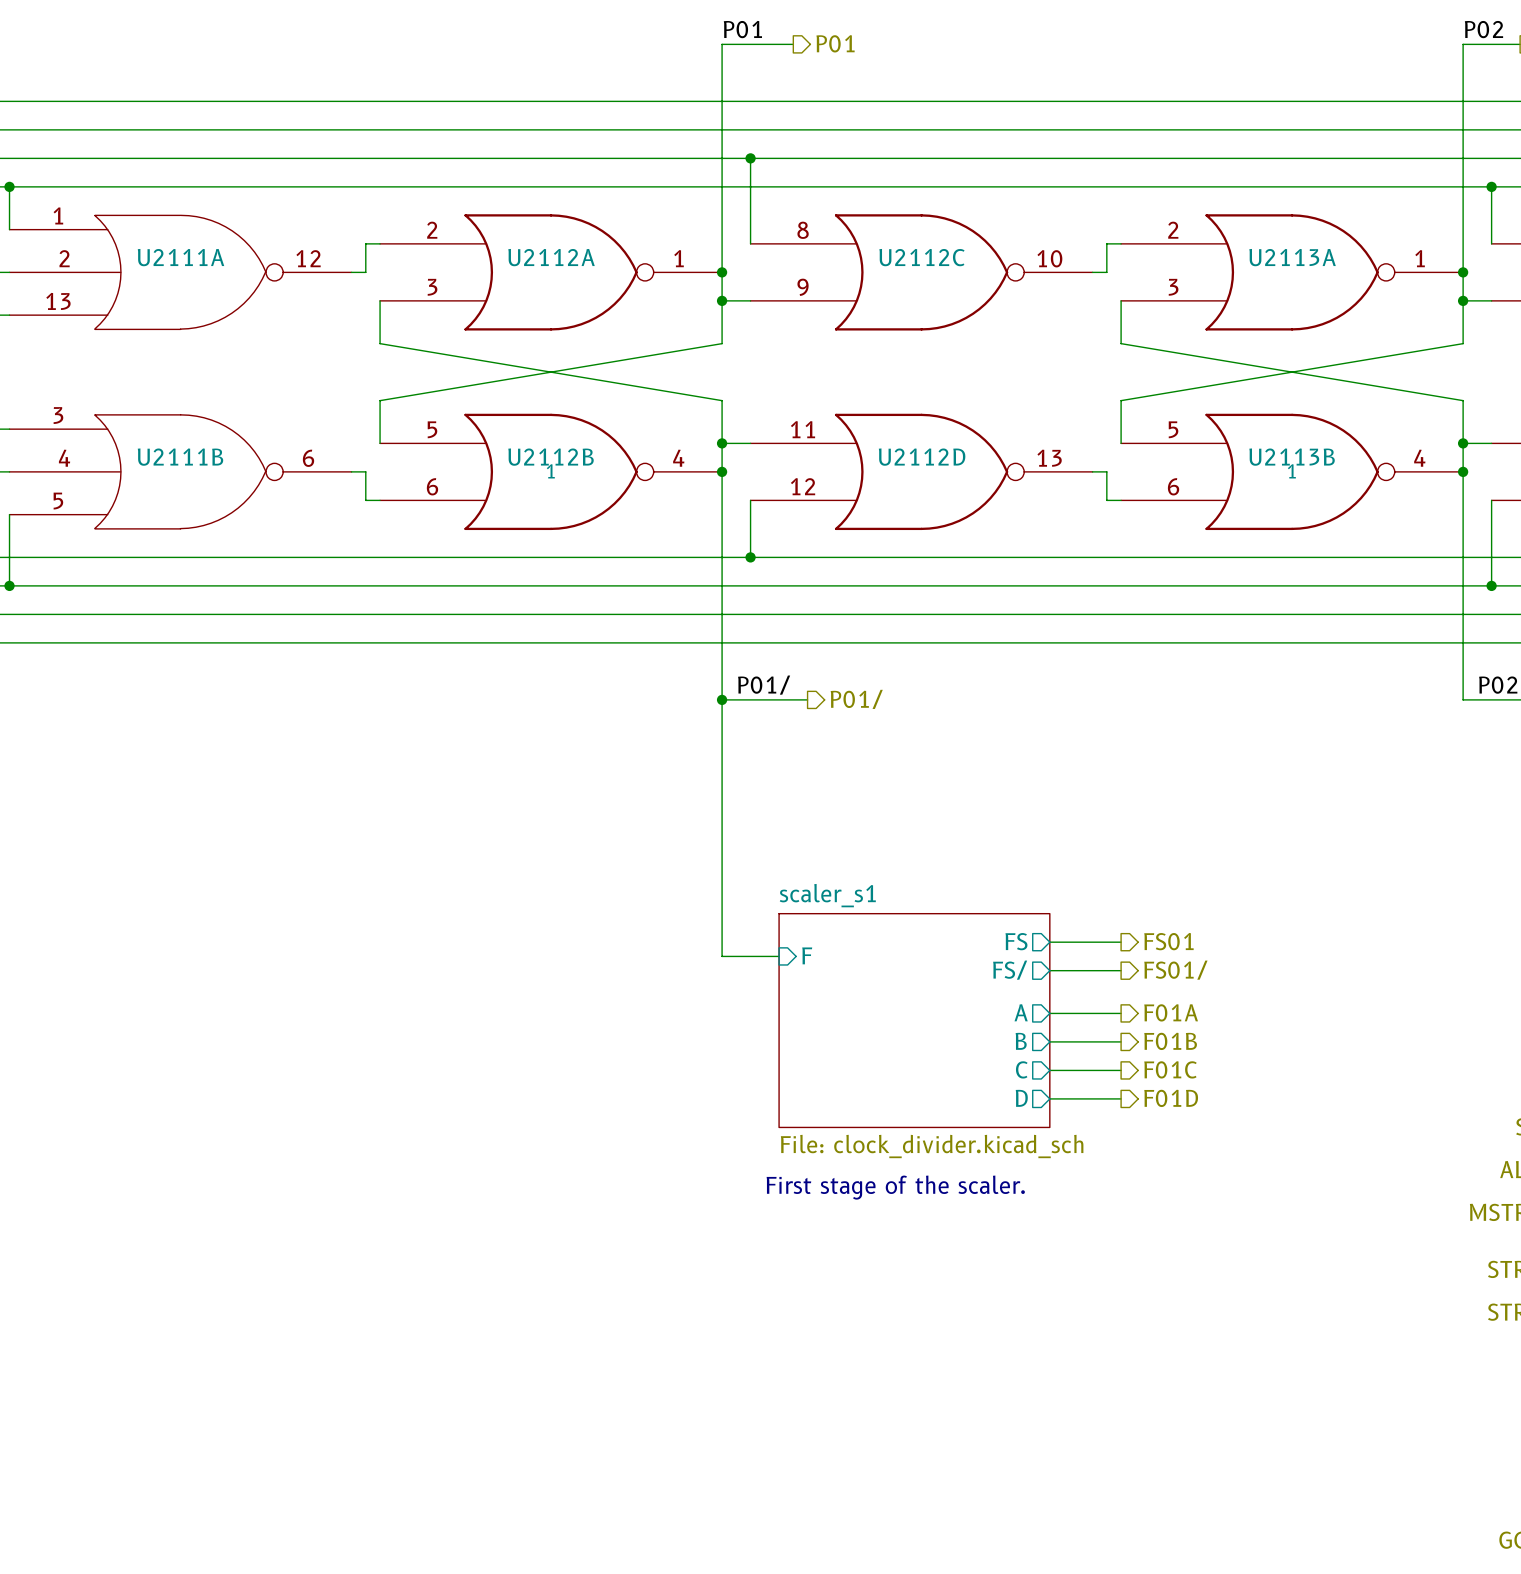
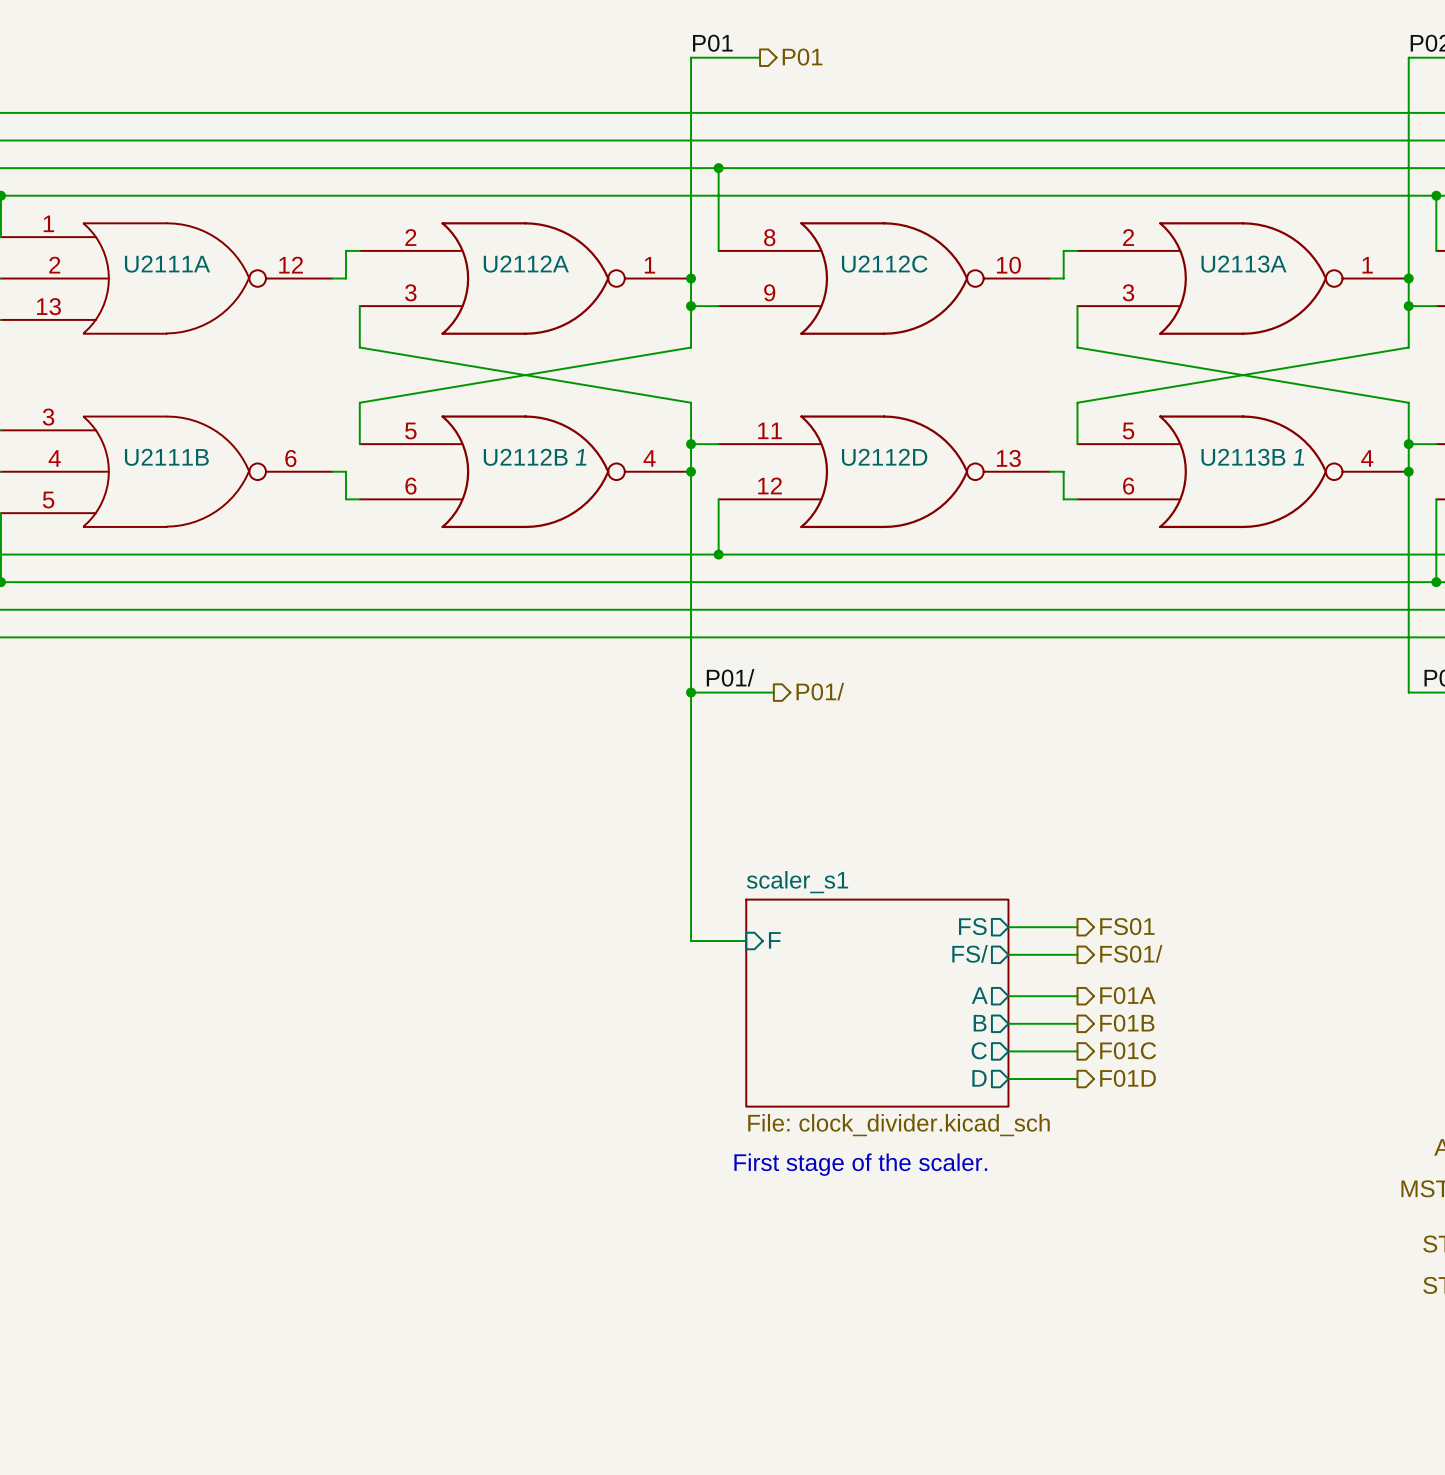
U2112B text: none -> 1 (581, 457)
U2113B text: none -> 1 (1298, 457)
U2112B text: 1 (550, 471) -> none
U2113B text: 1 (1291, 471) -> none

